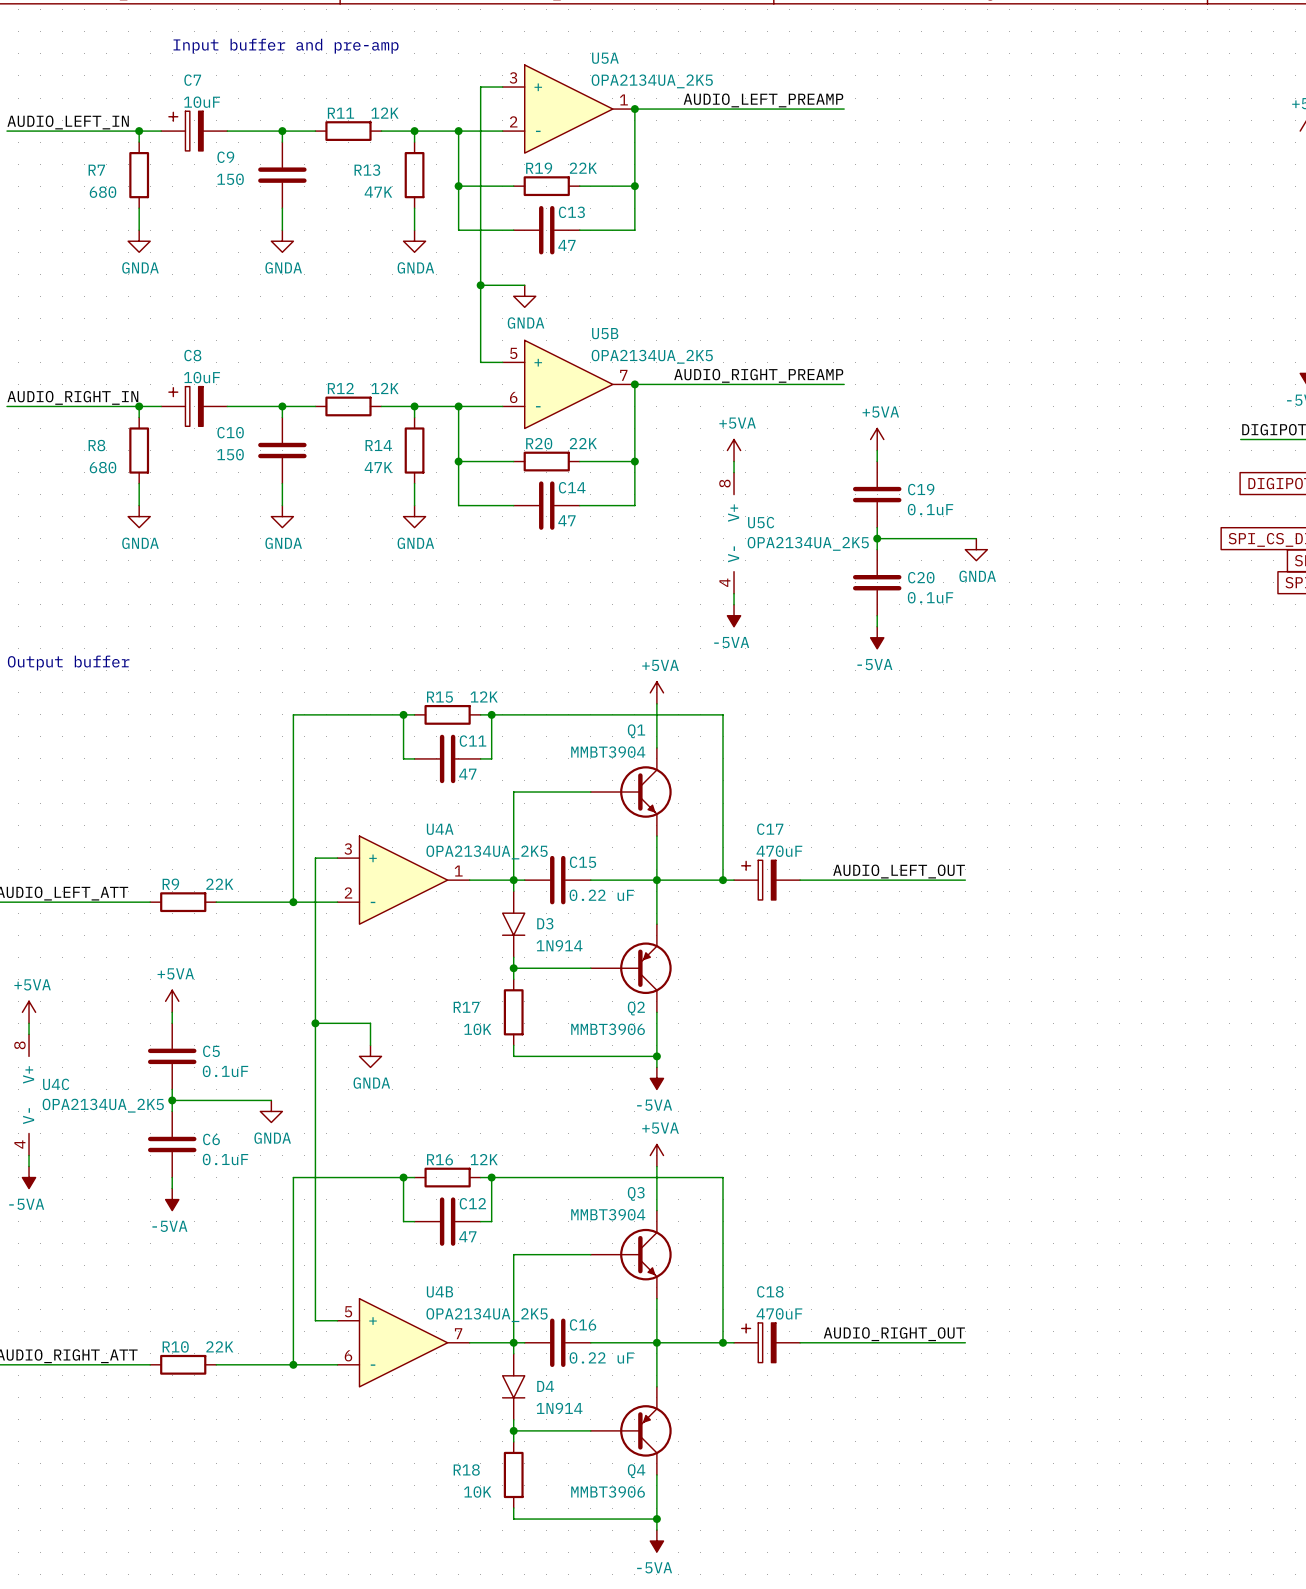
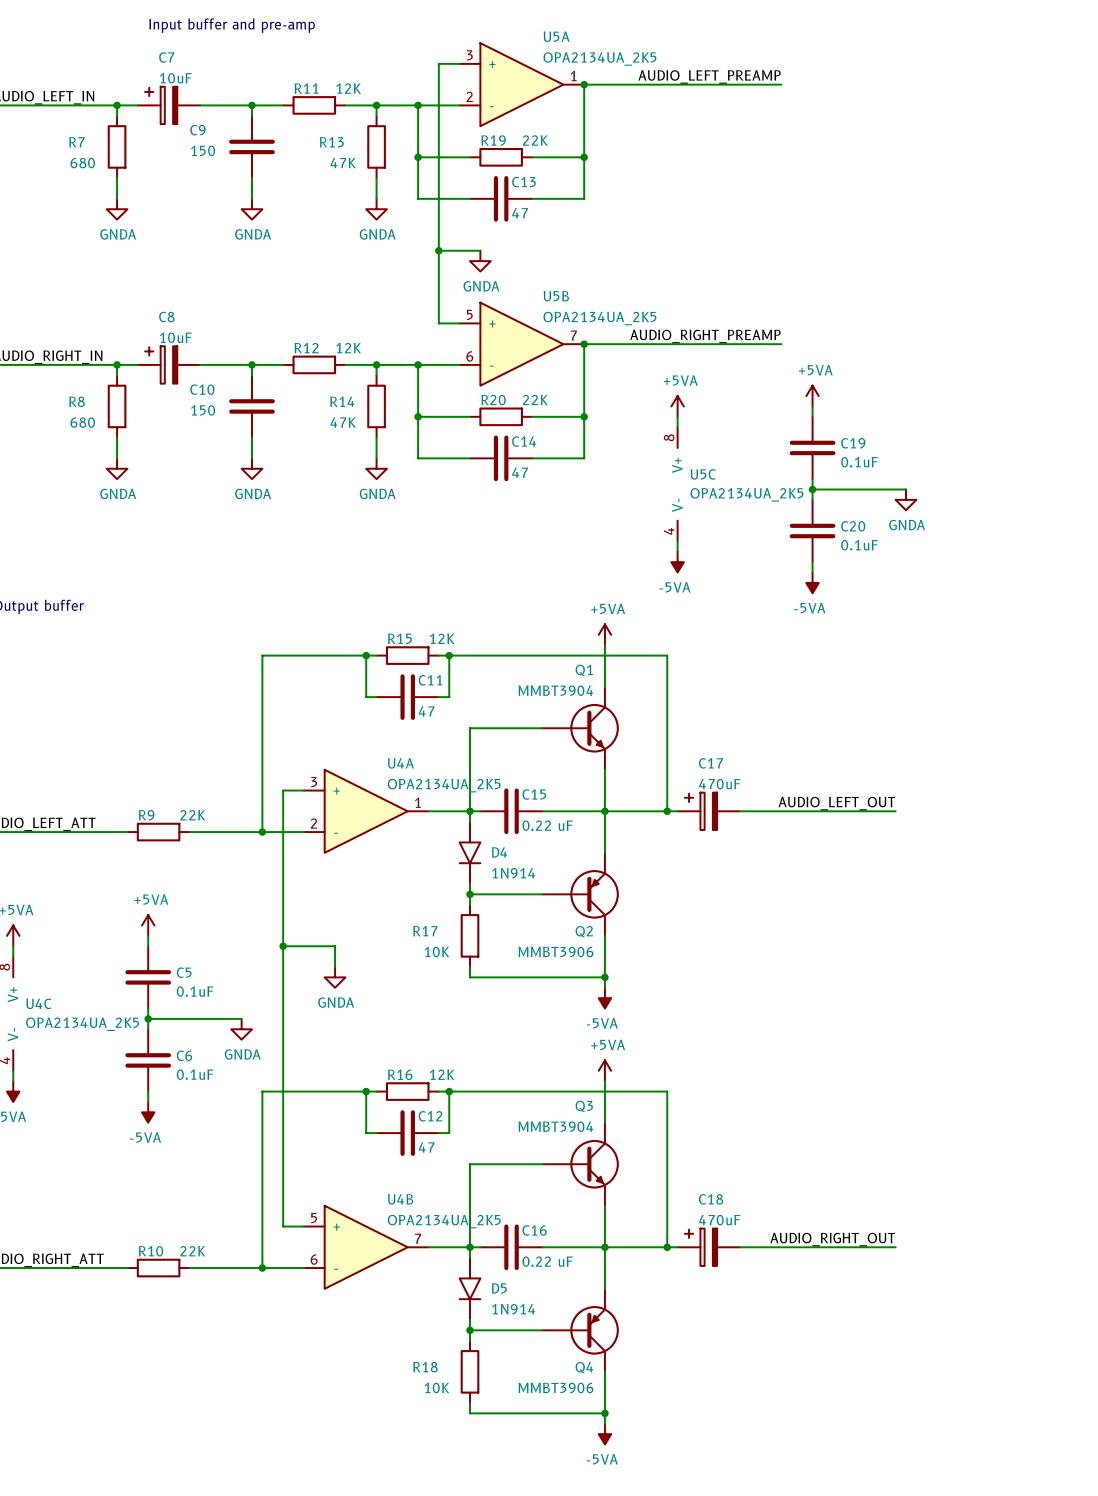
D3 name: D3 (545, 923) -> D4 (499, 852)
D4 name: D4 (545, 1386) -> D5 (499, 1288)

